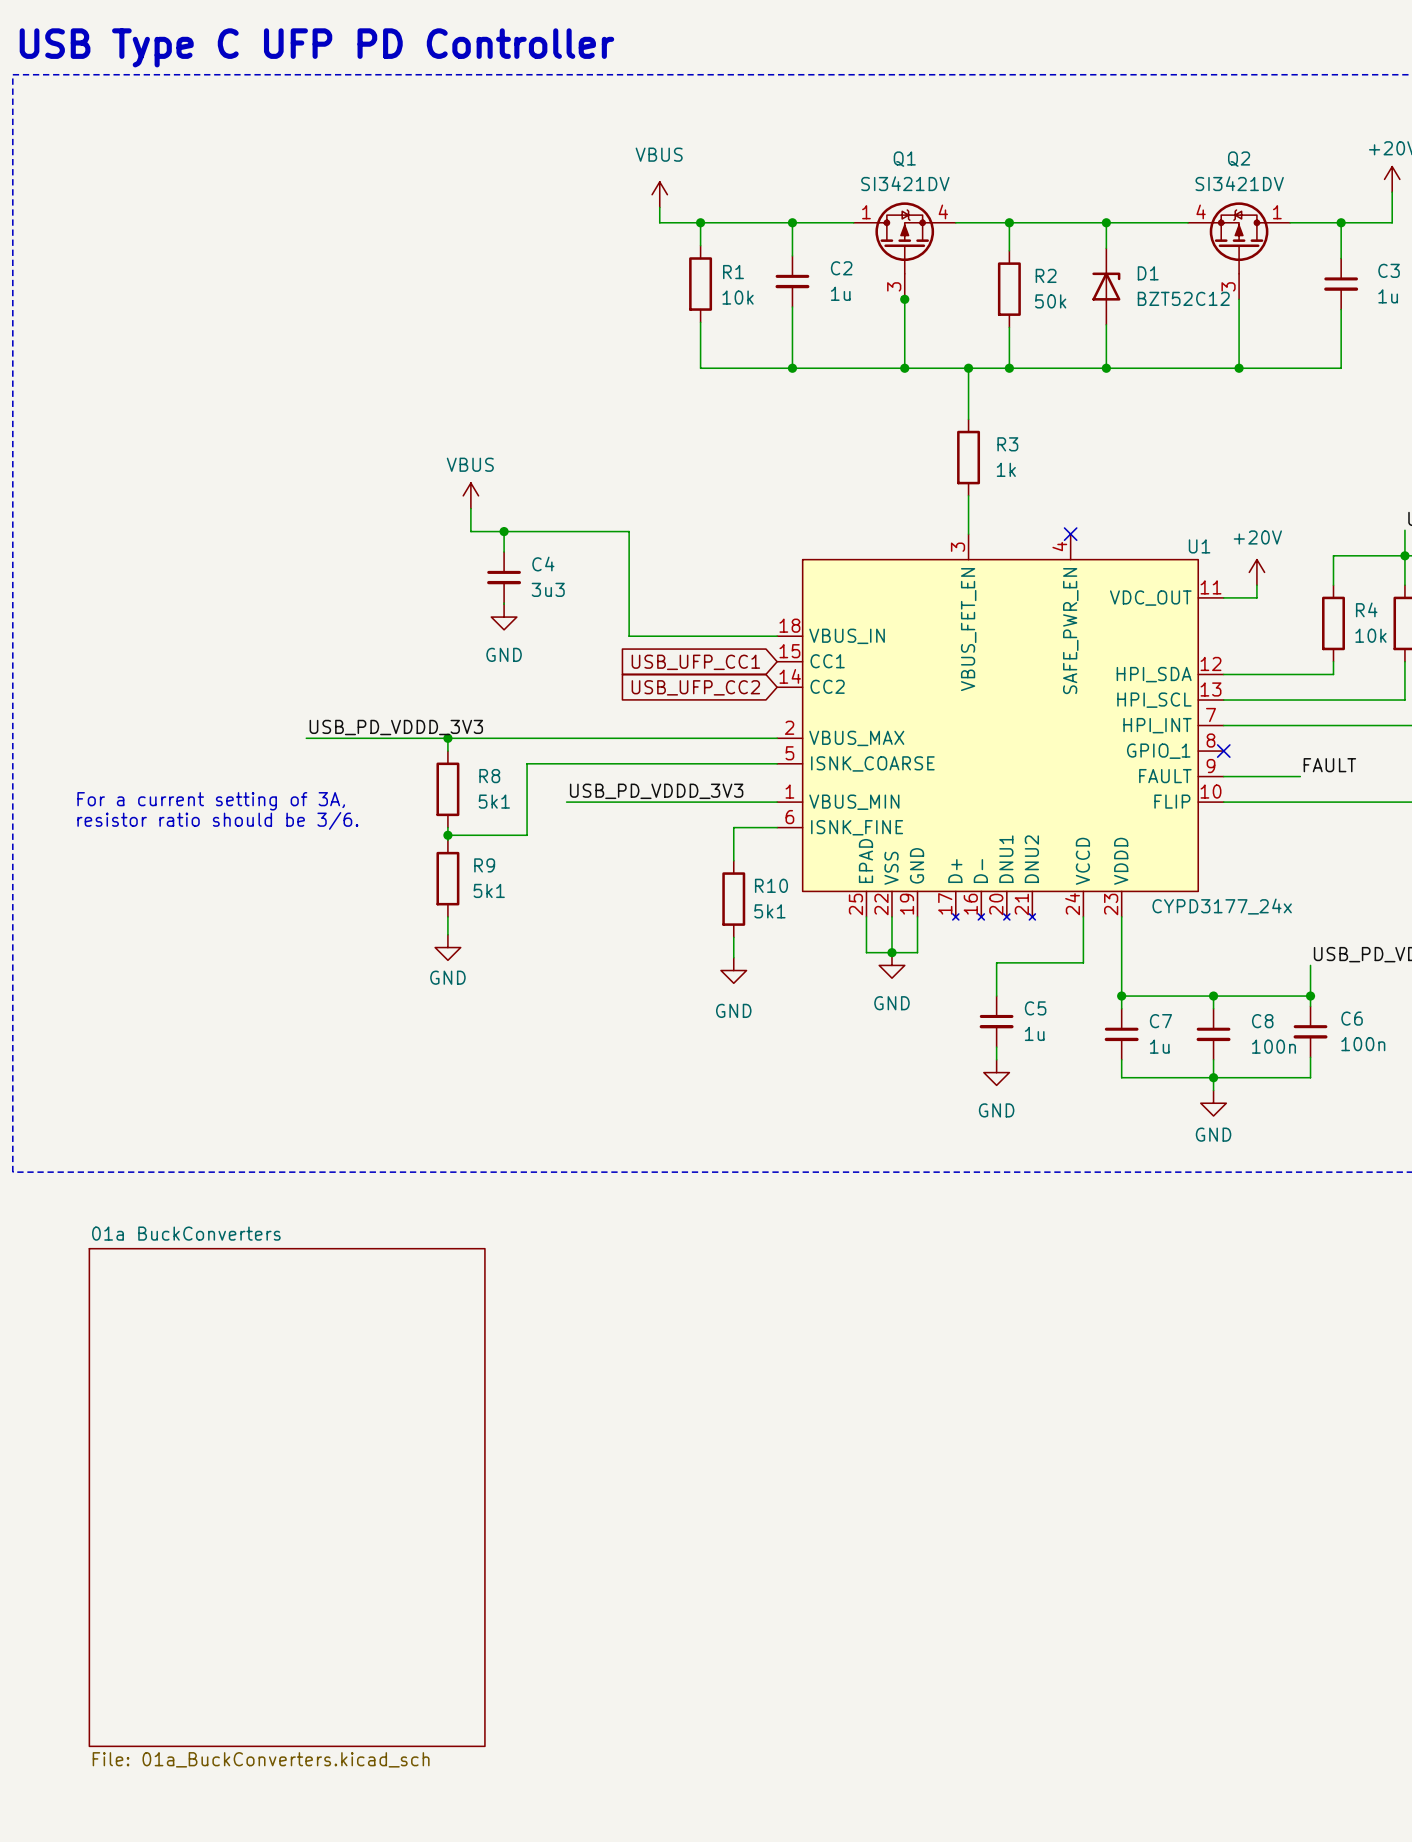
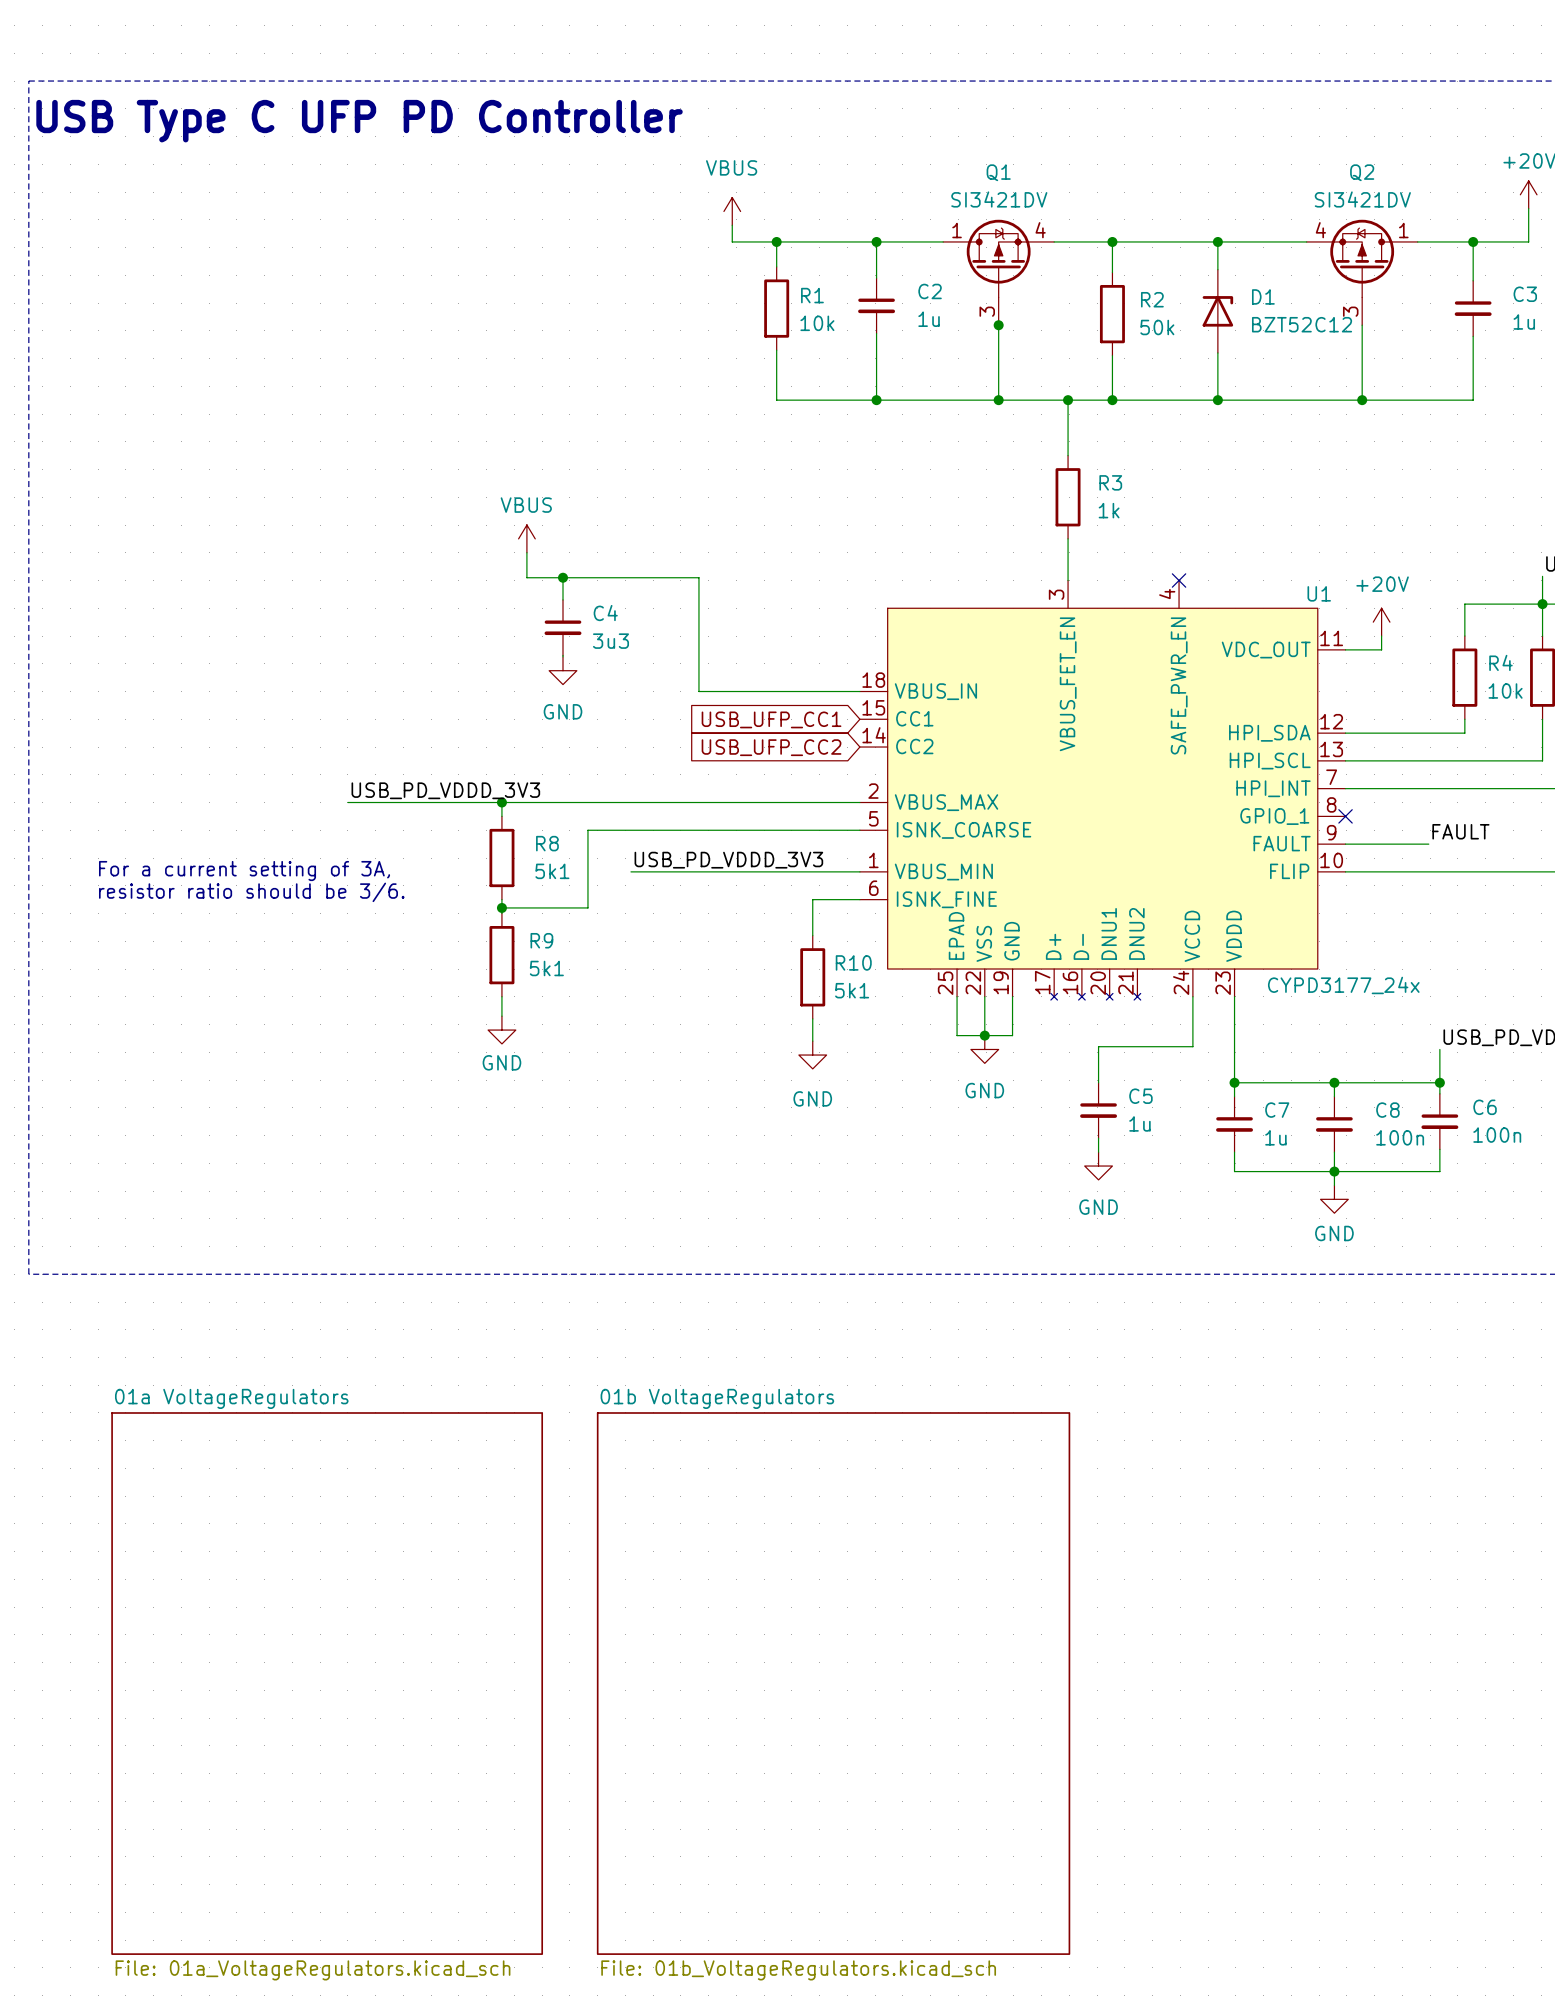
text position: USB Type C UFP PD Controller (316, 47) -> USB Type C UFP PD Controller (359, 121)
sheet 01a BuckConverters: File: 01a_BuckConverters.kicad_sch (287, 1497) -> none
sheet 01a VoltageRegulators: none -> File: 01a_VoltageRegulators.kicad_sch (327, 1683)
sheet 01b VoltageRegulators: none -> File: 01b_VoltageRegulators.kicad_sch (833, 1683)

